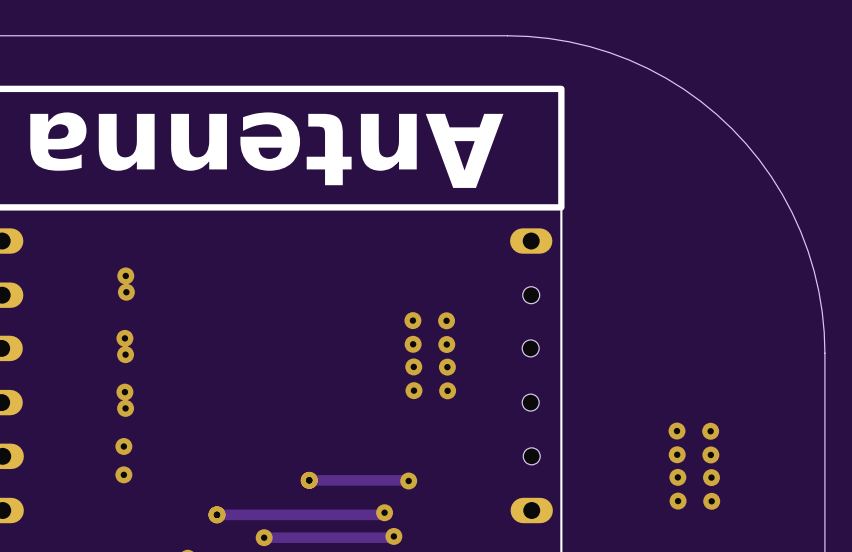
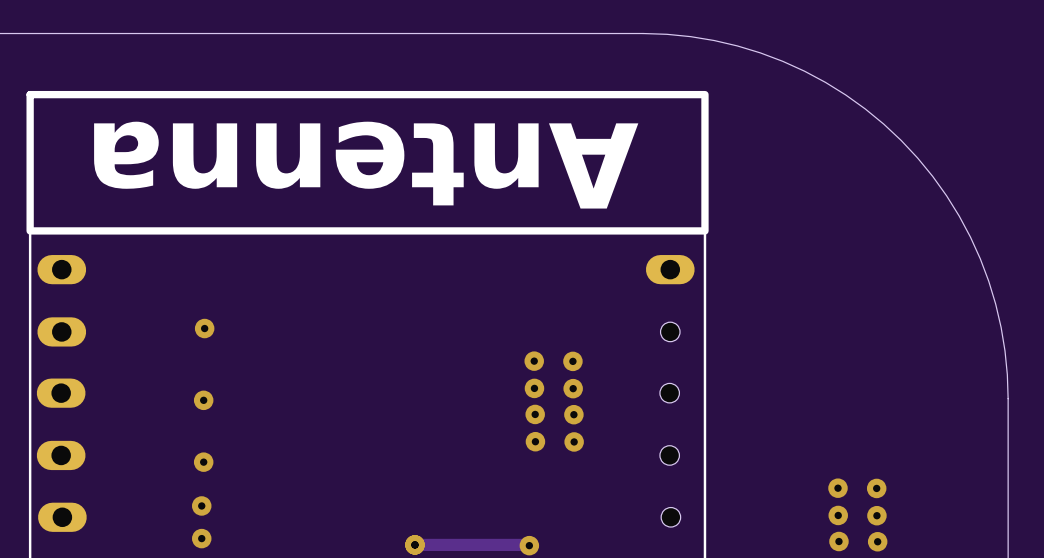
via: (125, 275) -> none
via: (124, 338) -> none
via: (124, 392) -> none

